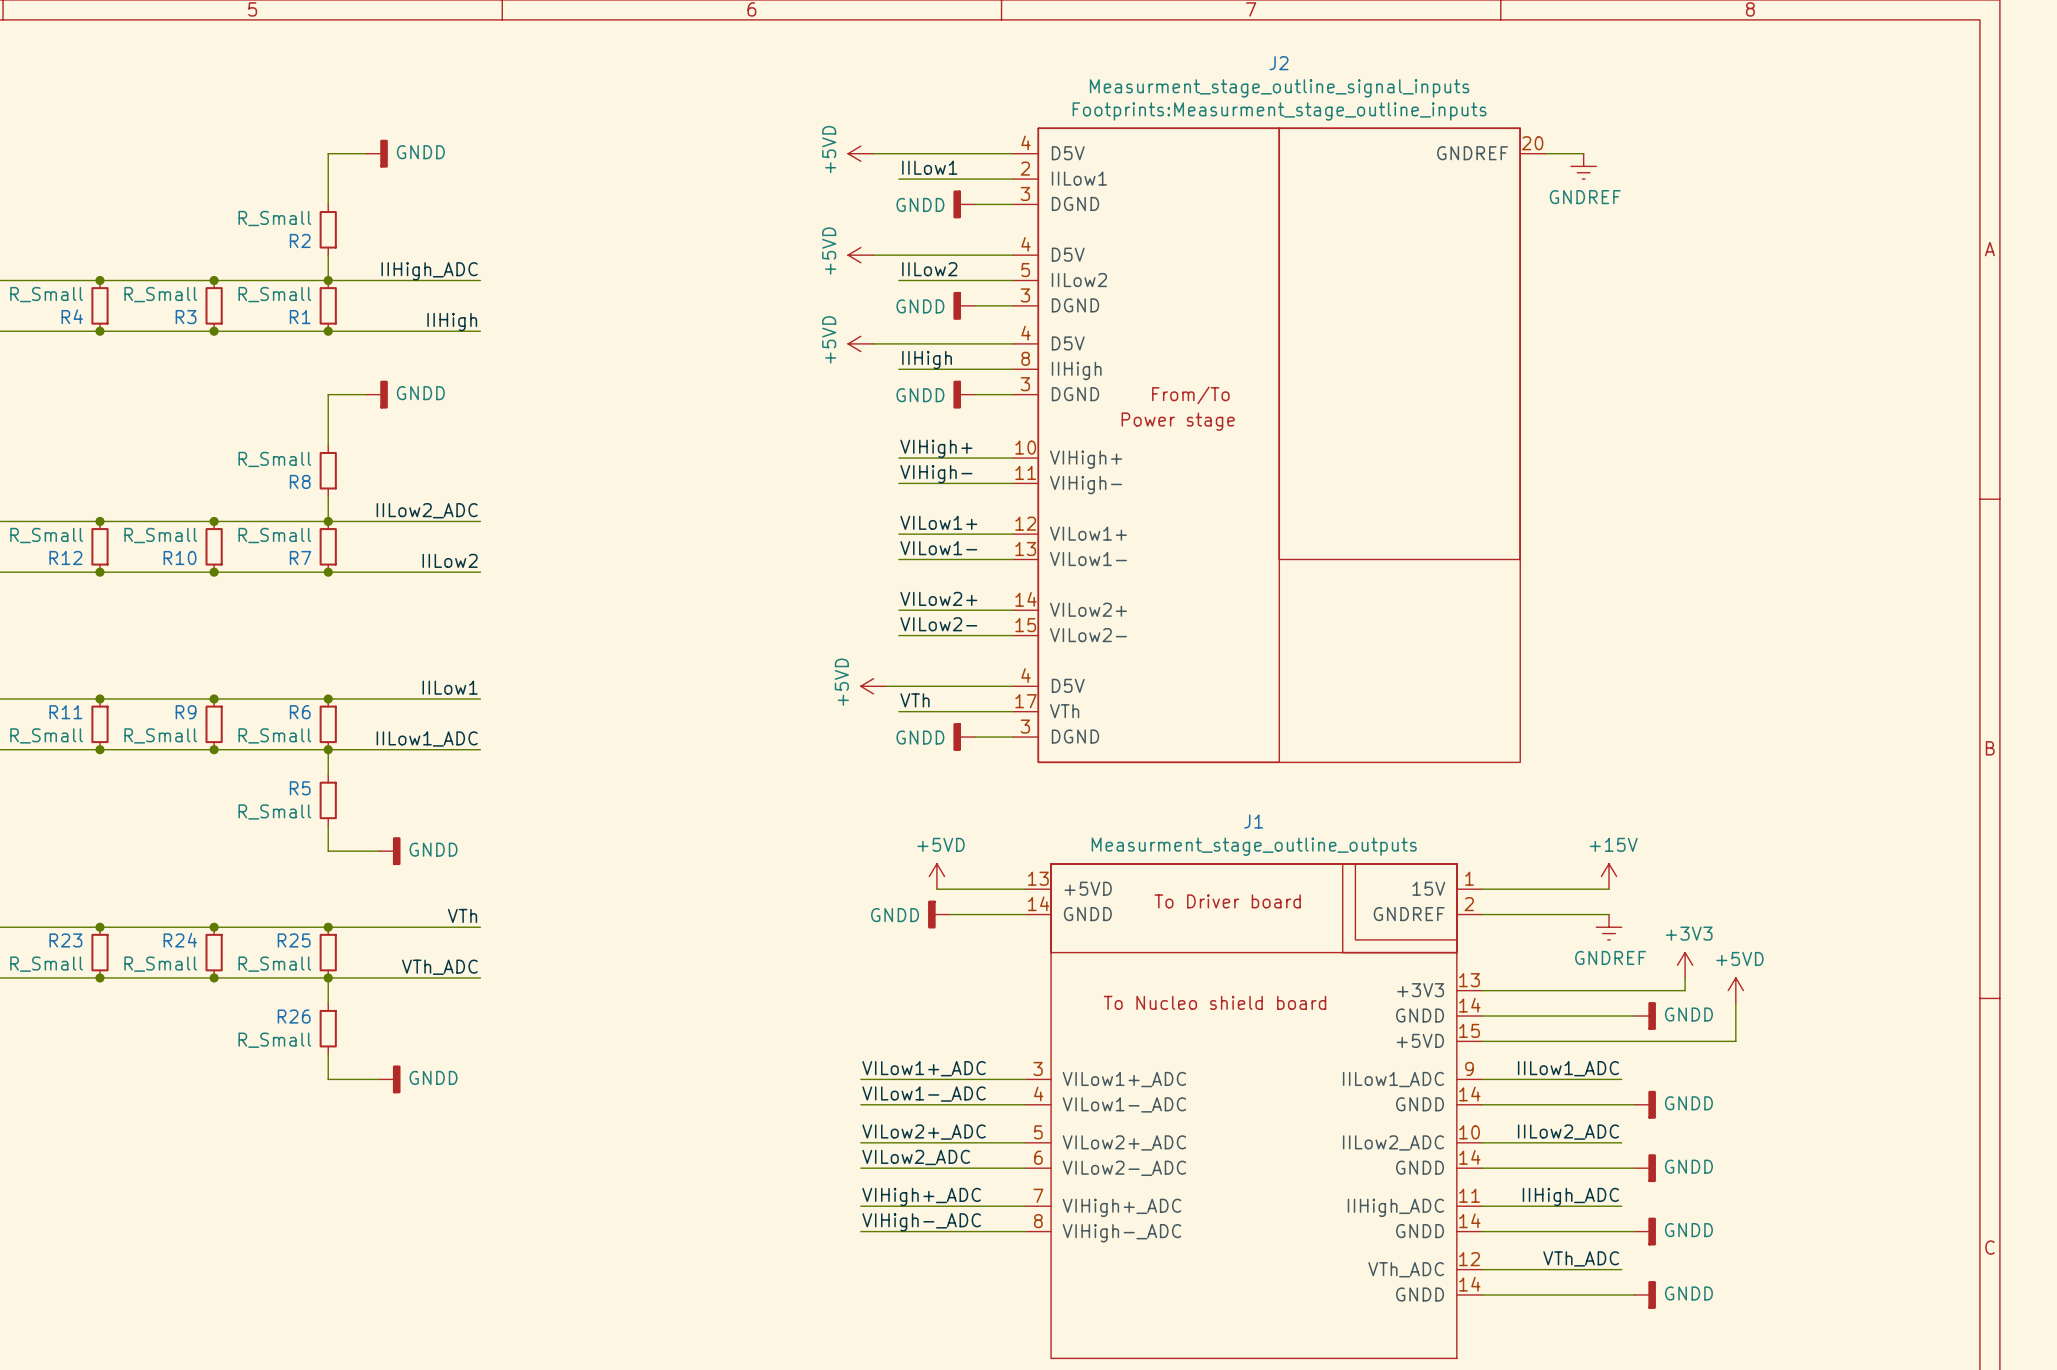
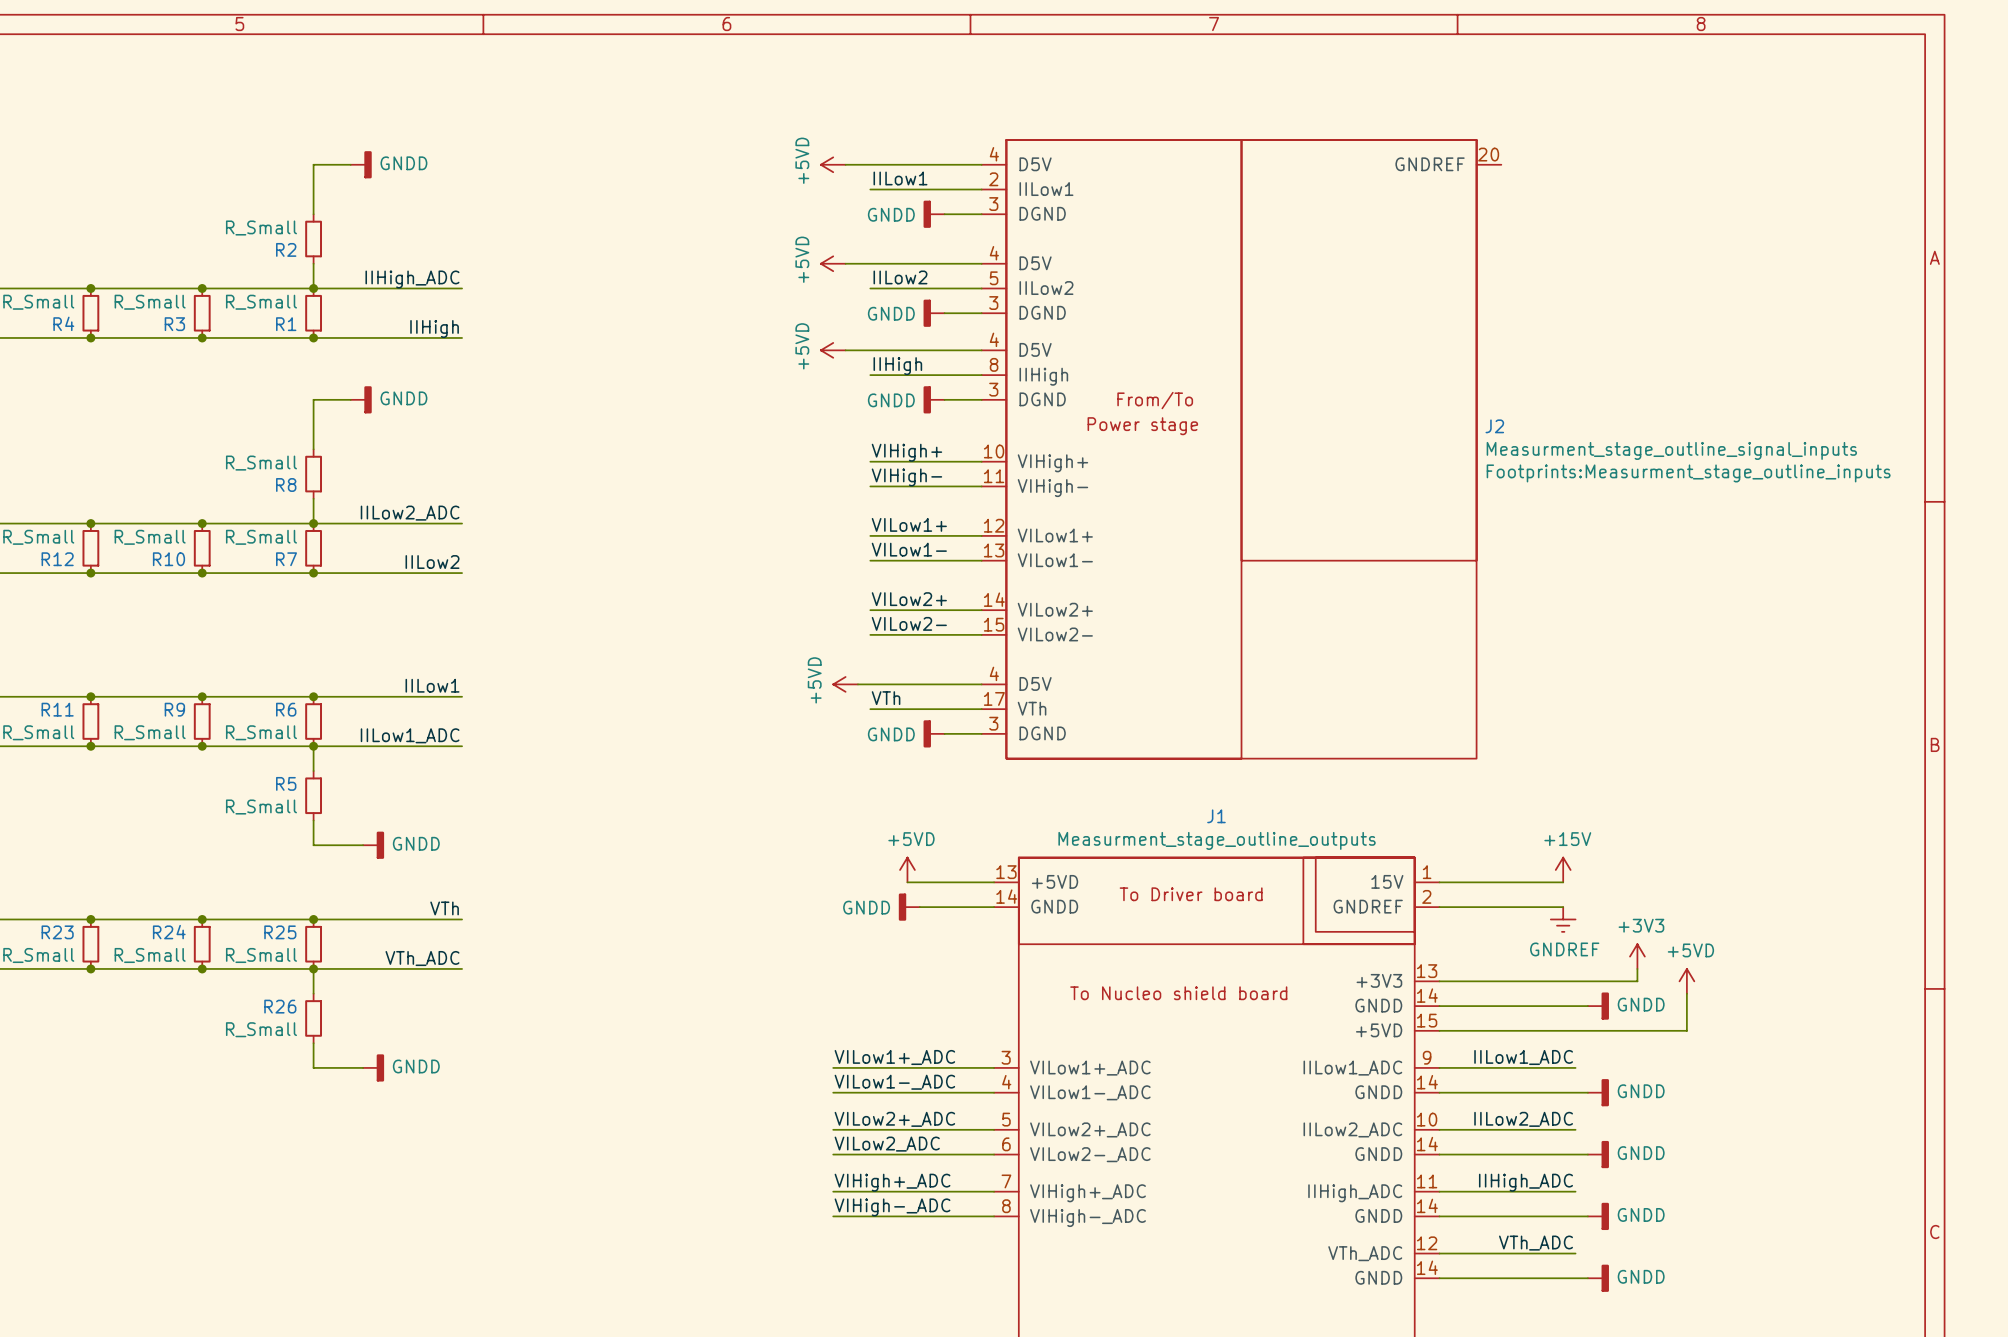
J2 name position: J2 (1279, 63) -> J2 (1494, 426)
J2 value position: Measurment_stage_outline_signal_inputs (1279, 88) -> Measurment_stage_outline_signal_inputs (1671, 450)
J2 text position: Footprints:Measurment_stage_outline_inputs (1279, 111) -> Footprints:Measurment_stage_outline_inputs (1688, 473)
wire: (1545, 153) (1583, 153) -> none
power symbol: GNDREF (1583, 166) -> none

